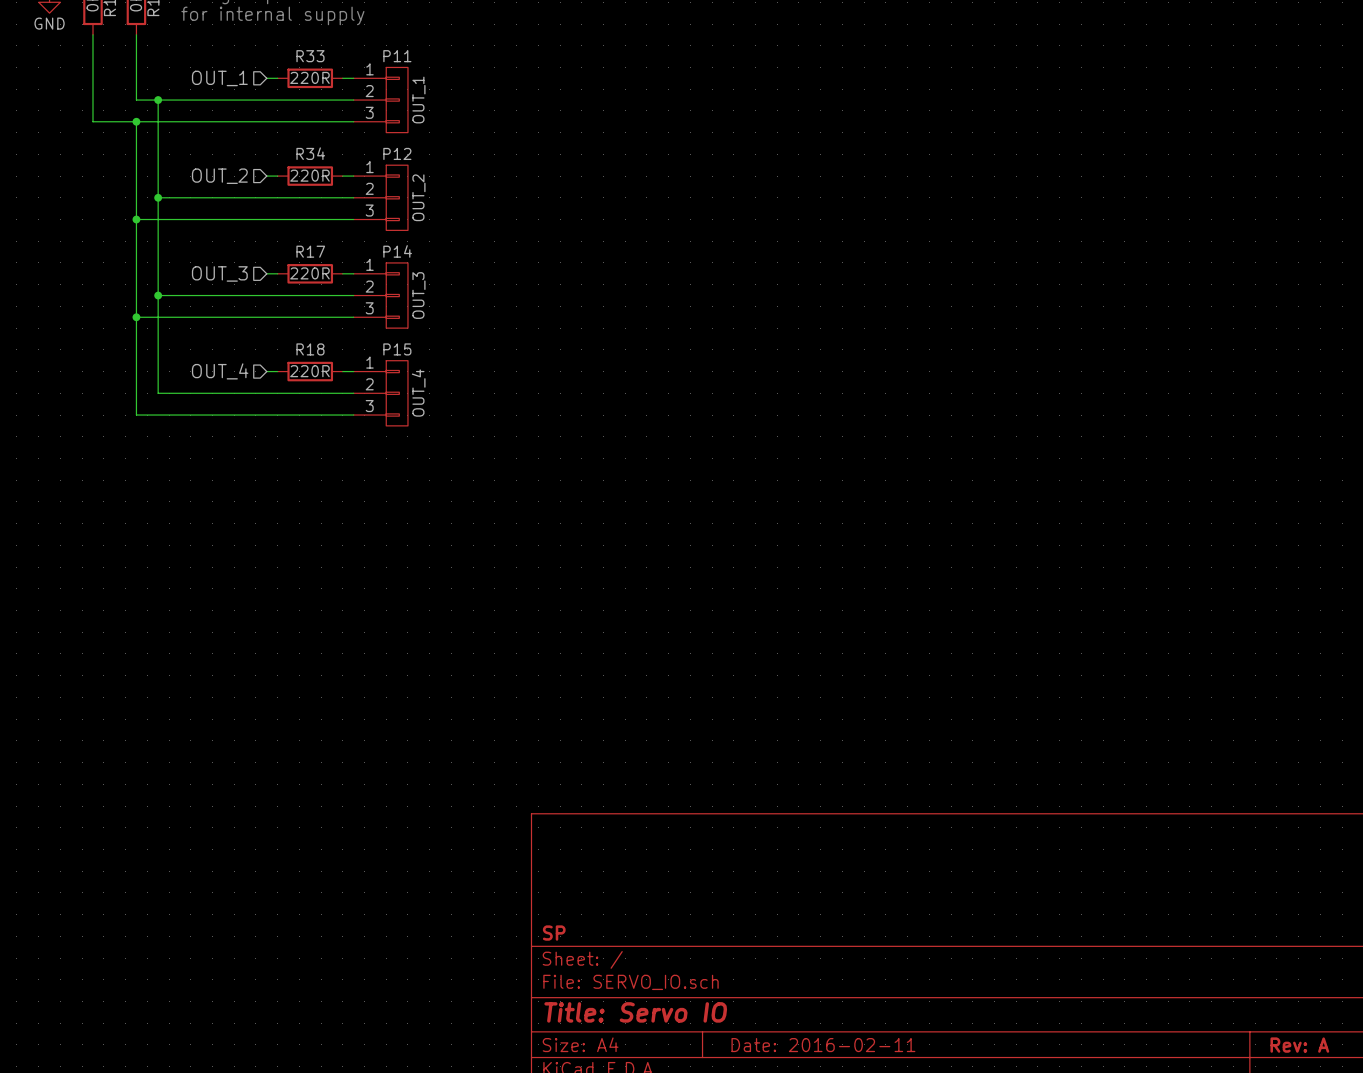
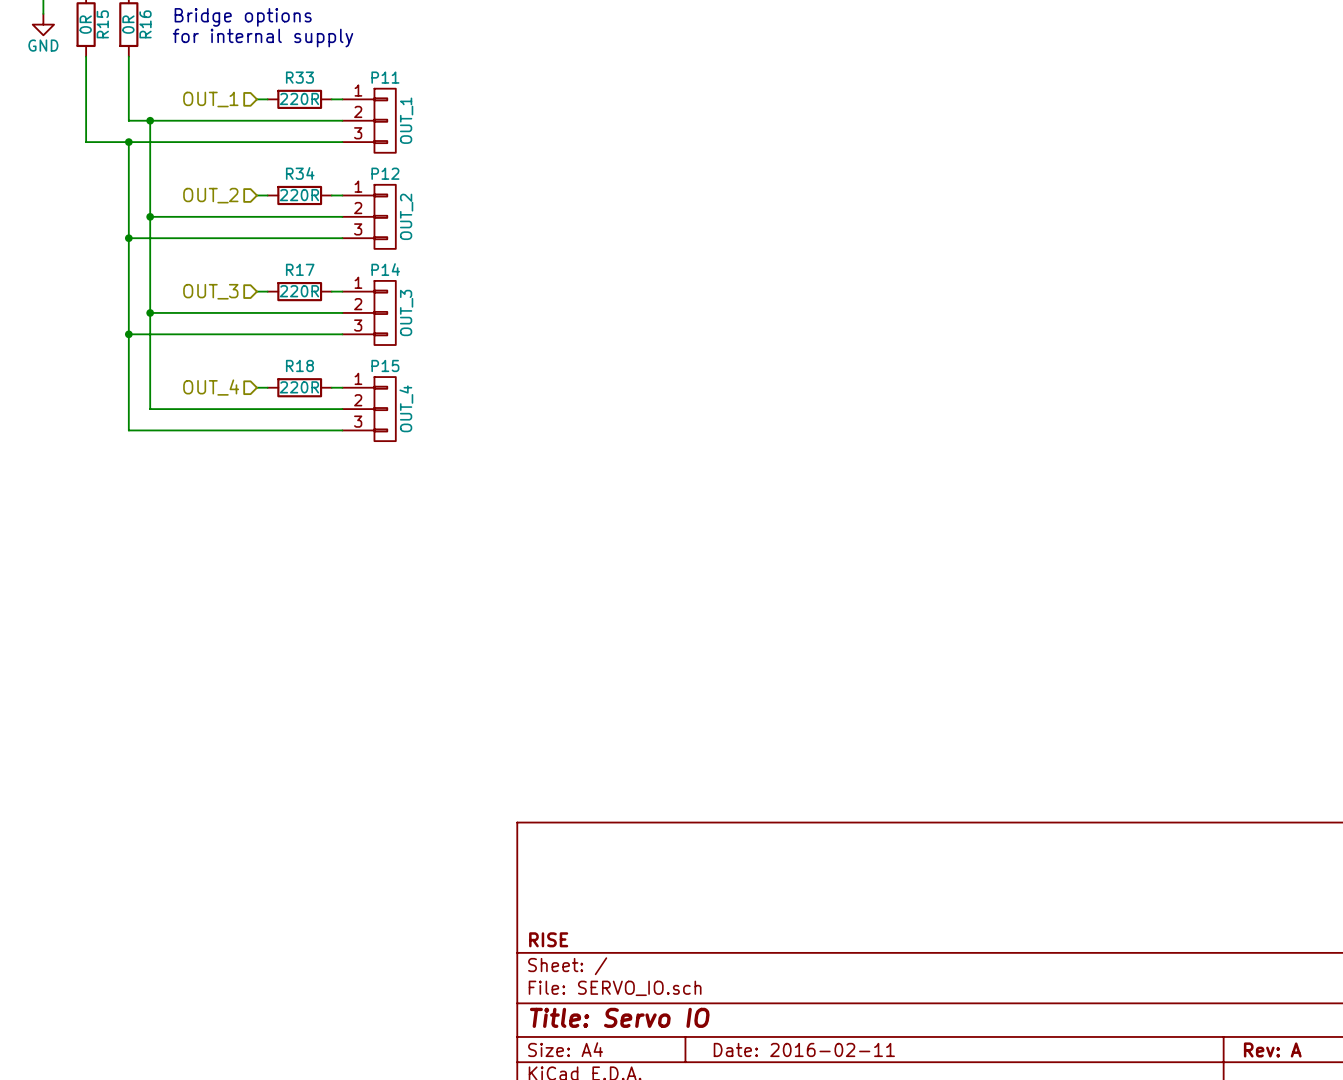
title block: SP (554, 933) -> RISE (548, 939)

